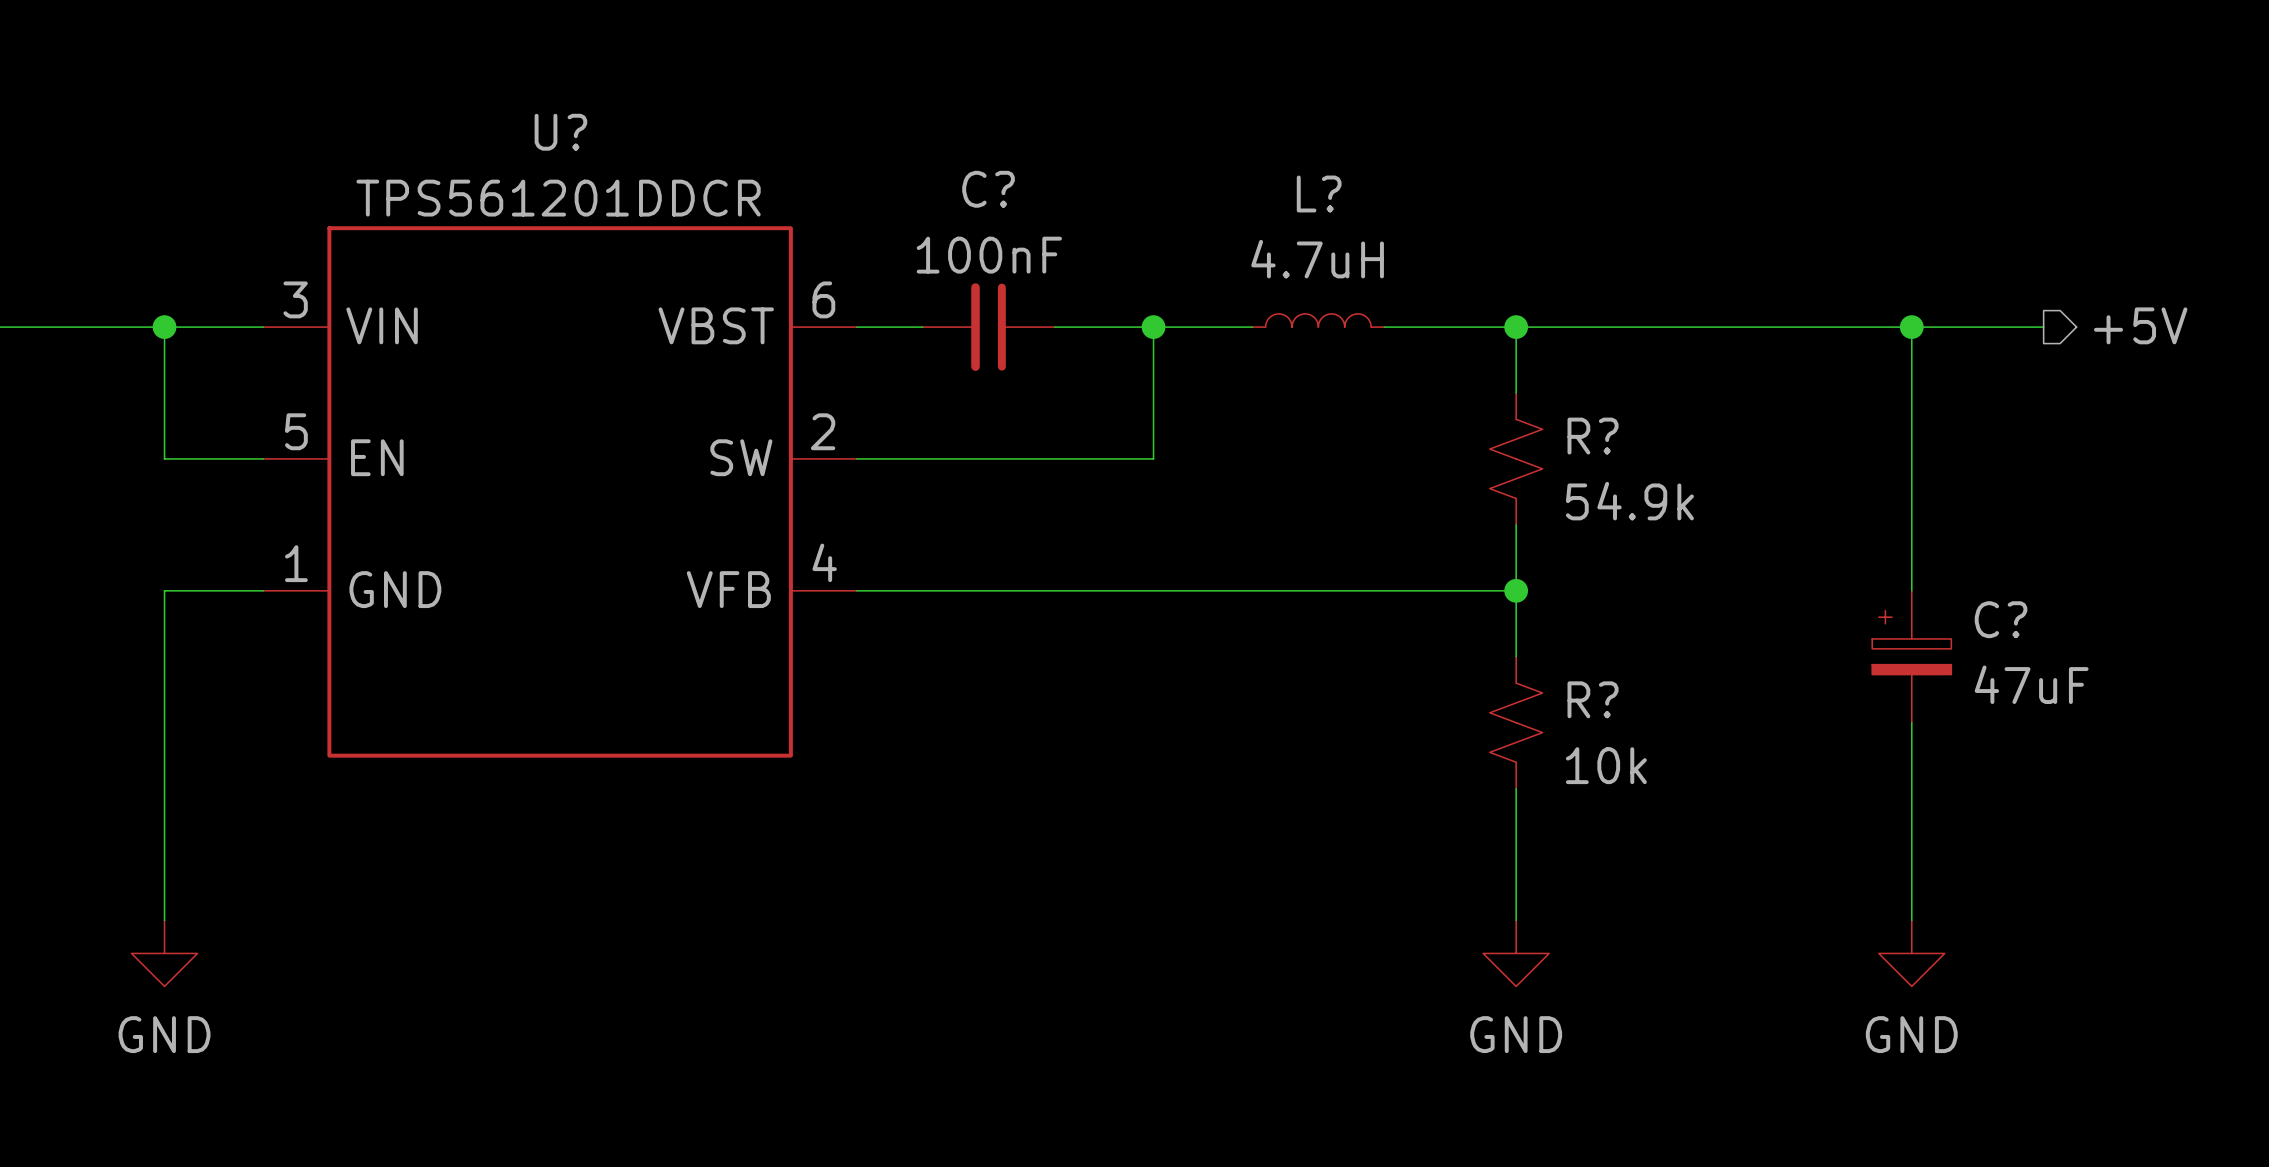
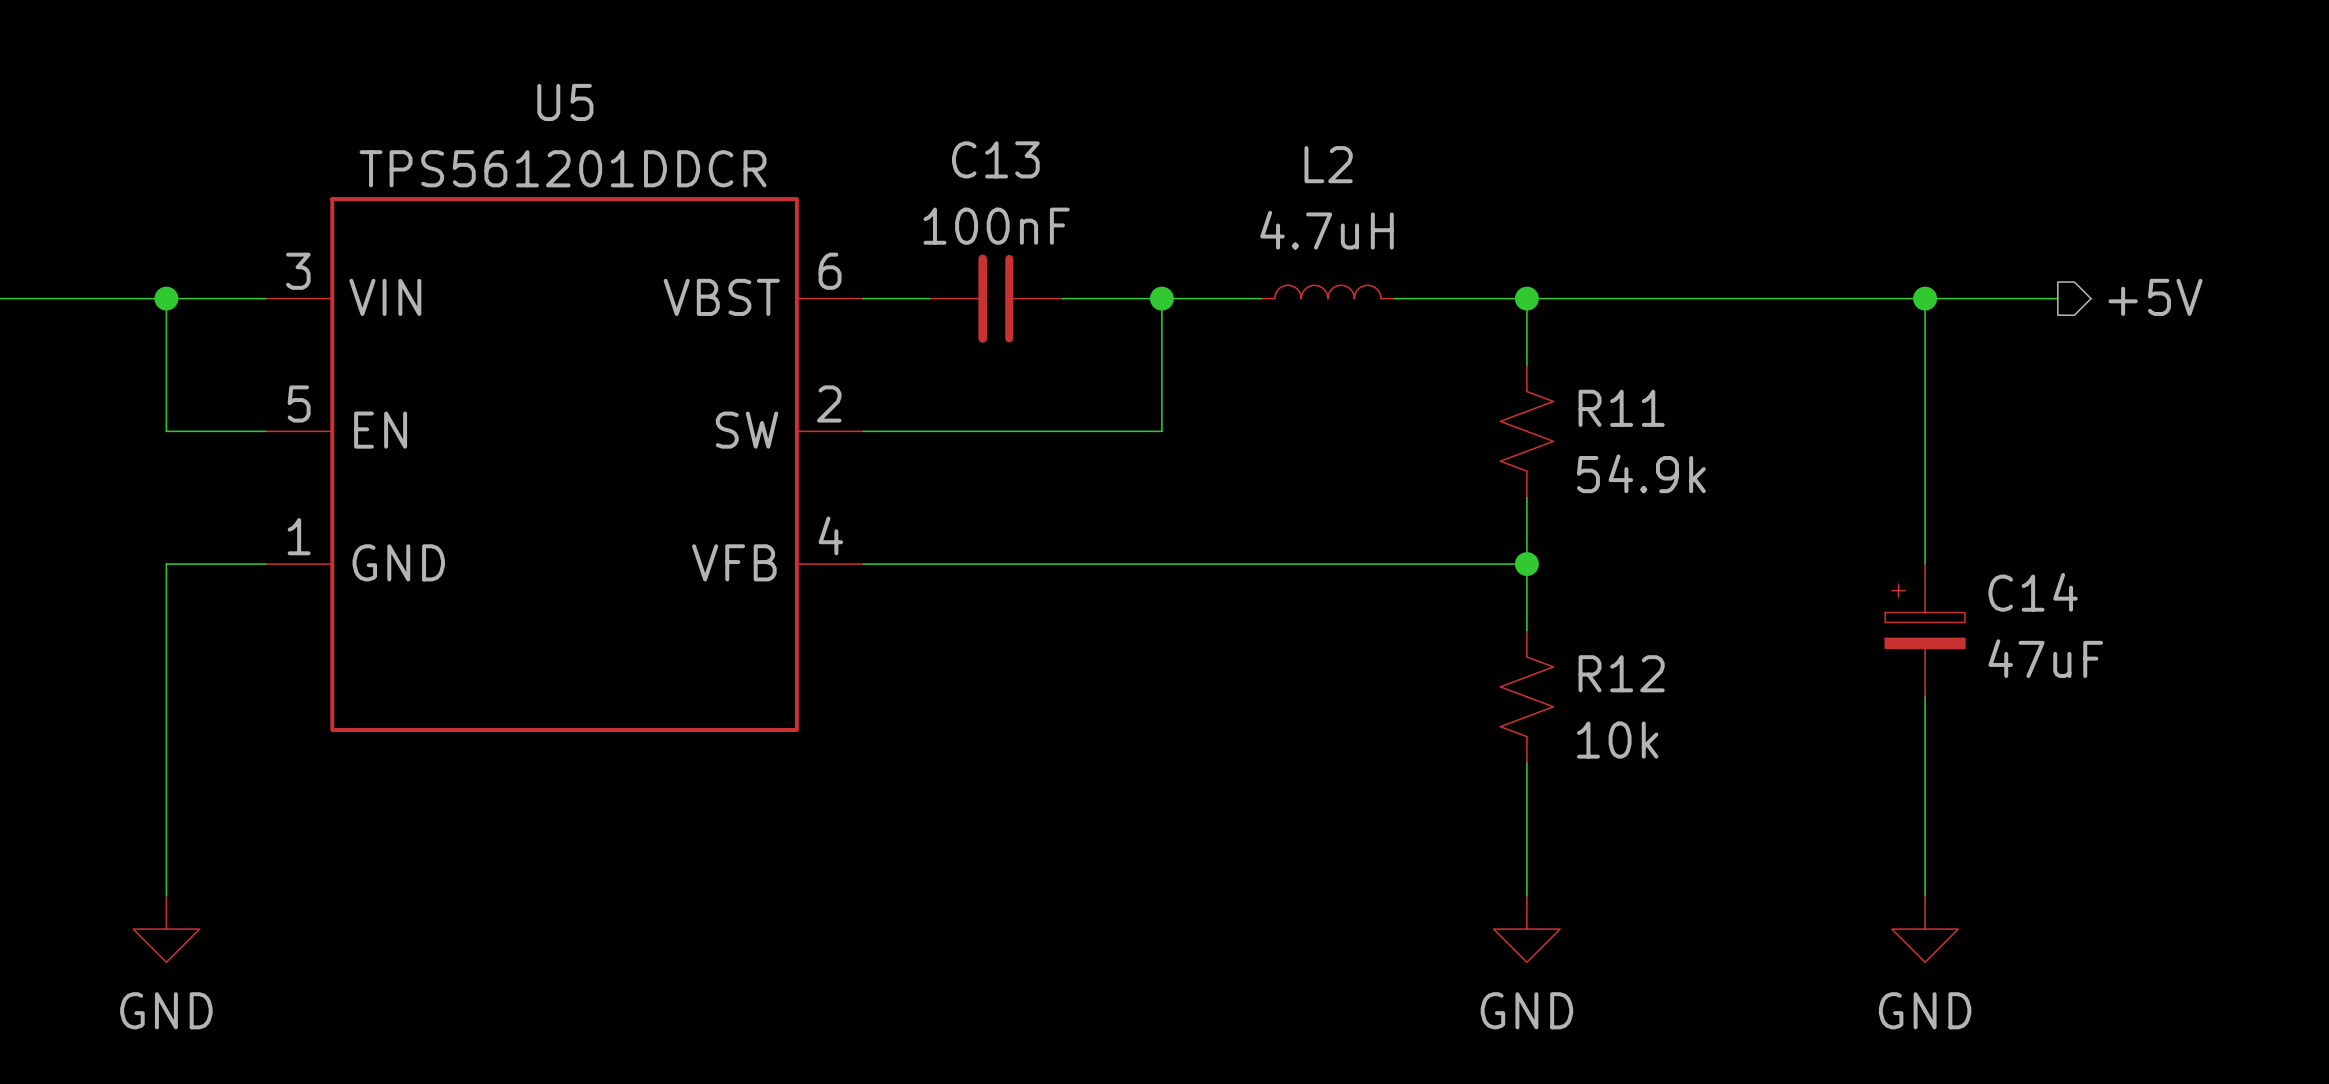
U? name: U? (560, 132) -> U5 (565, 102)
C? name: C? (988, 189) -> C13 (995, 159)
L? name: L? (1319, 193) -> L2 (1328, 164)
R? name: R? (1593, 436) -> R11 (1621, 408)
C? name: C? (2001, 619) -> C14 (2033, 592)
R? name: R? (1593, 699) -> R12 (1621, 673)

